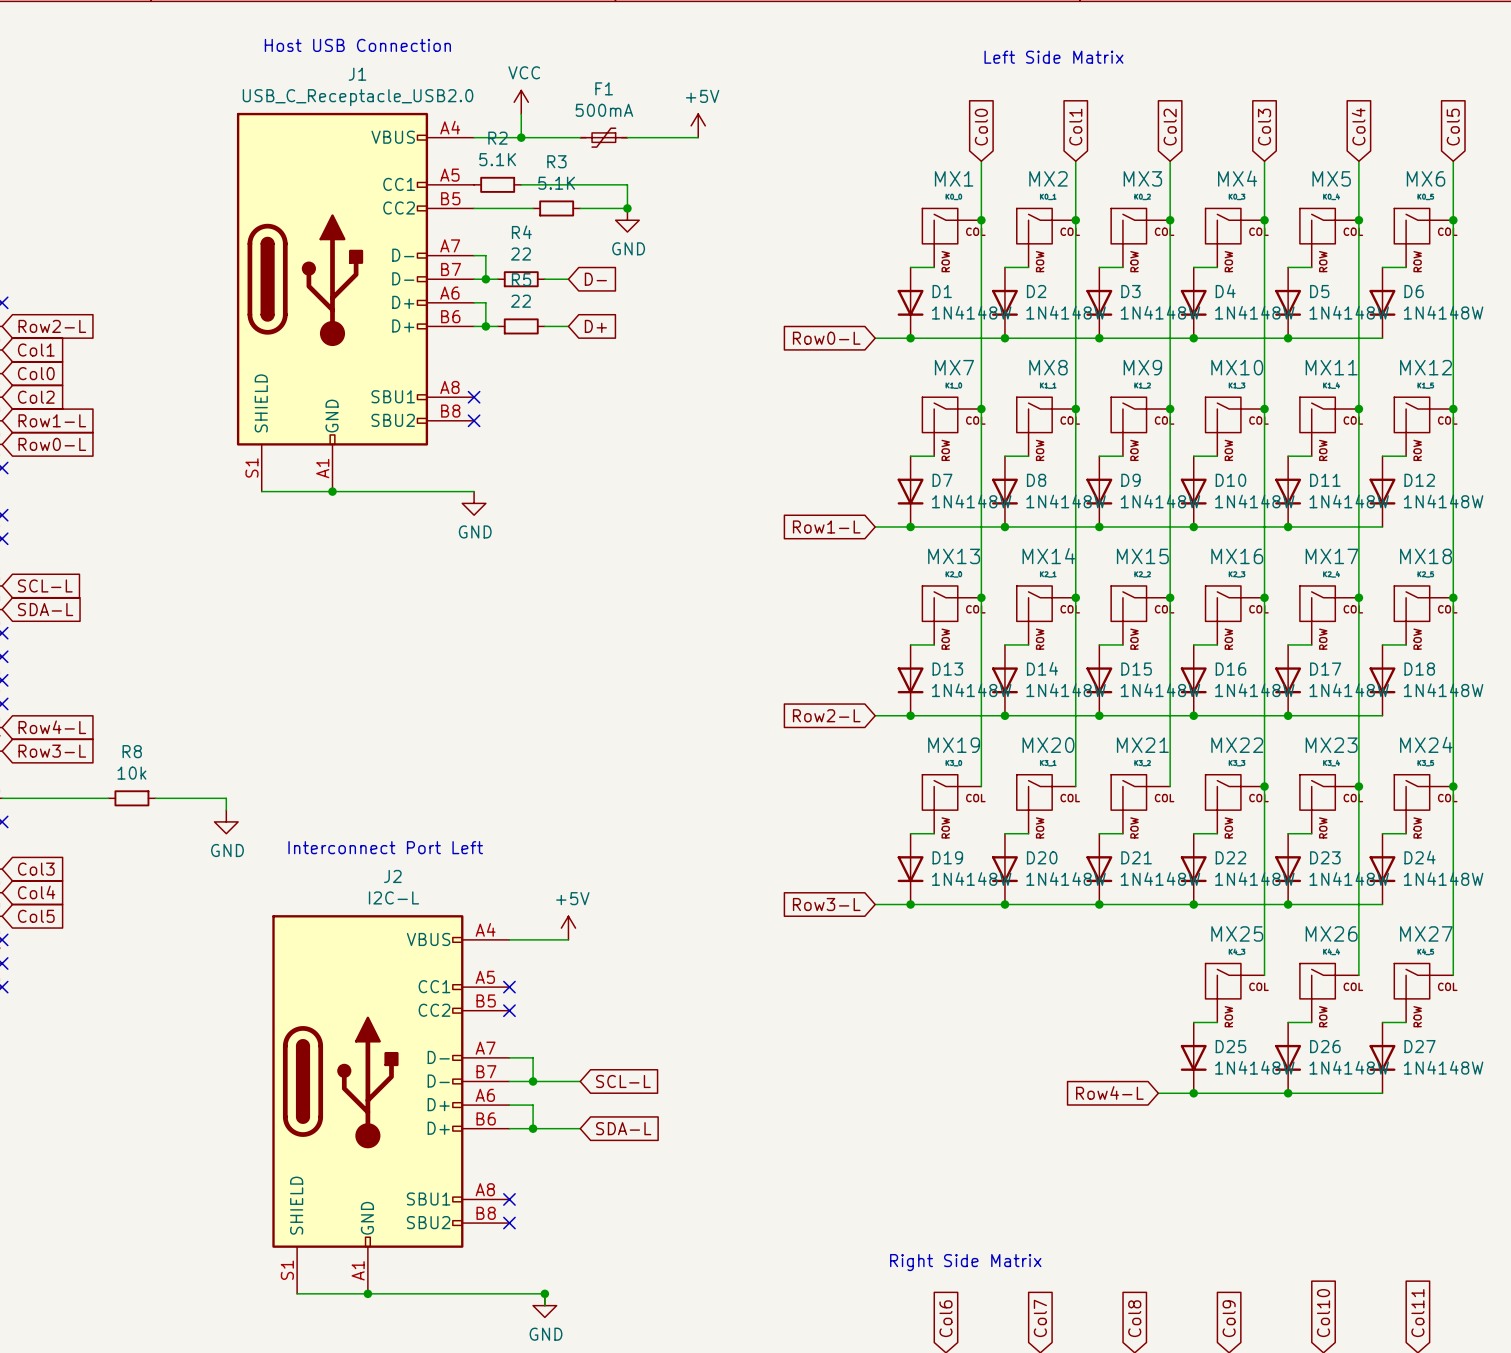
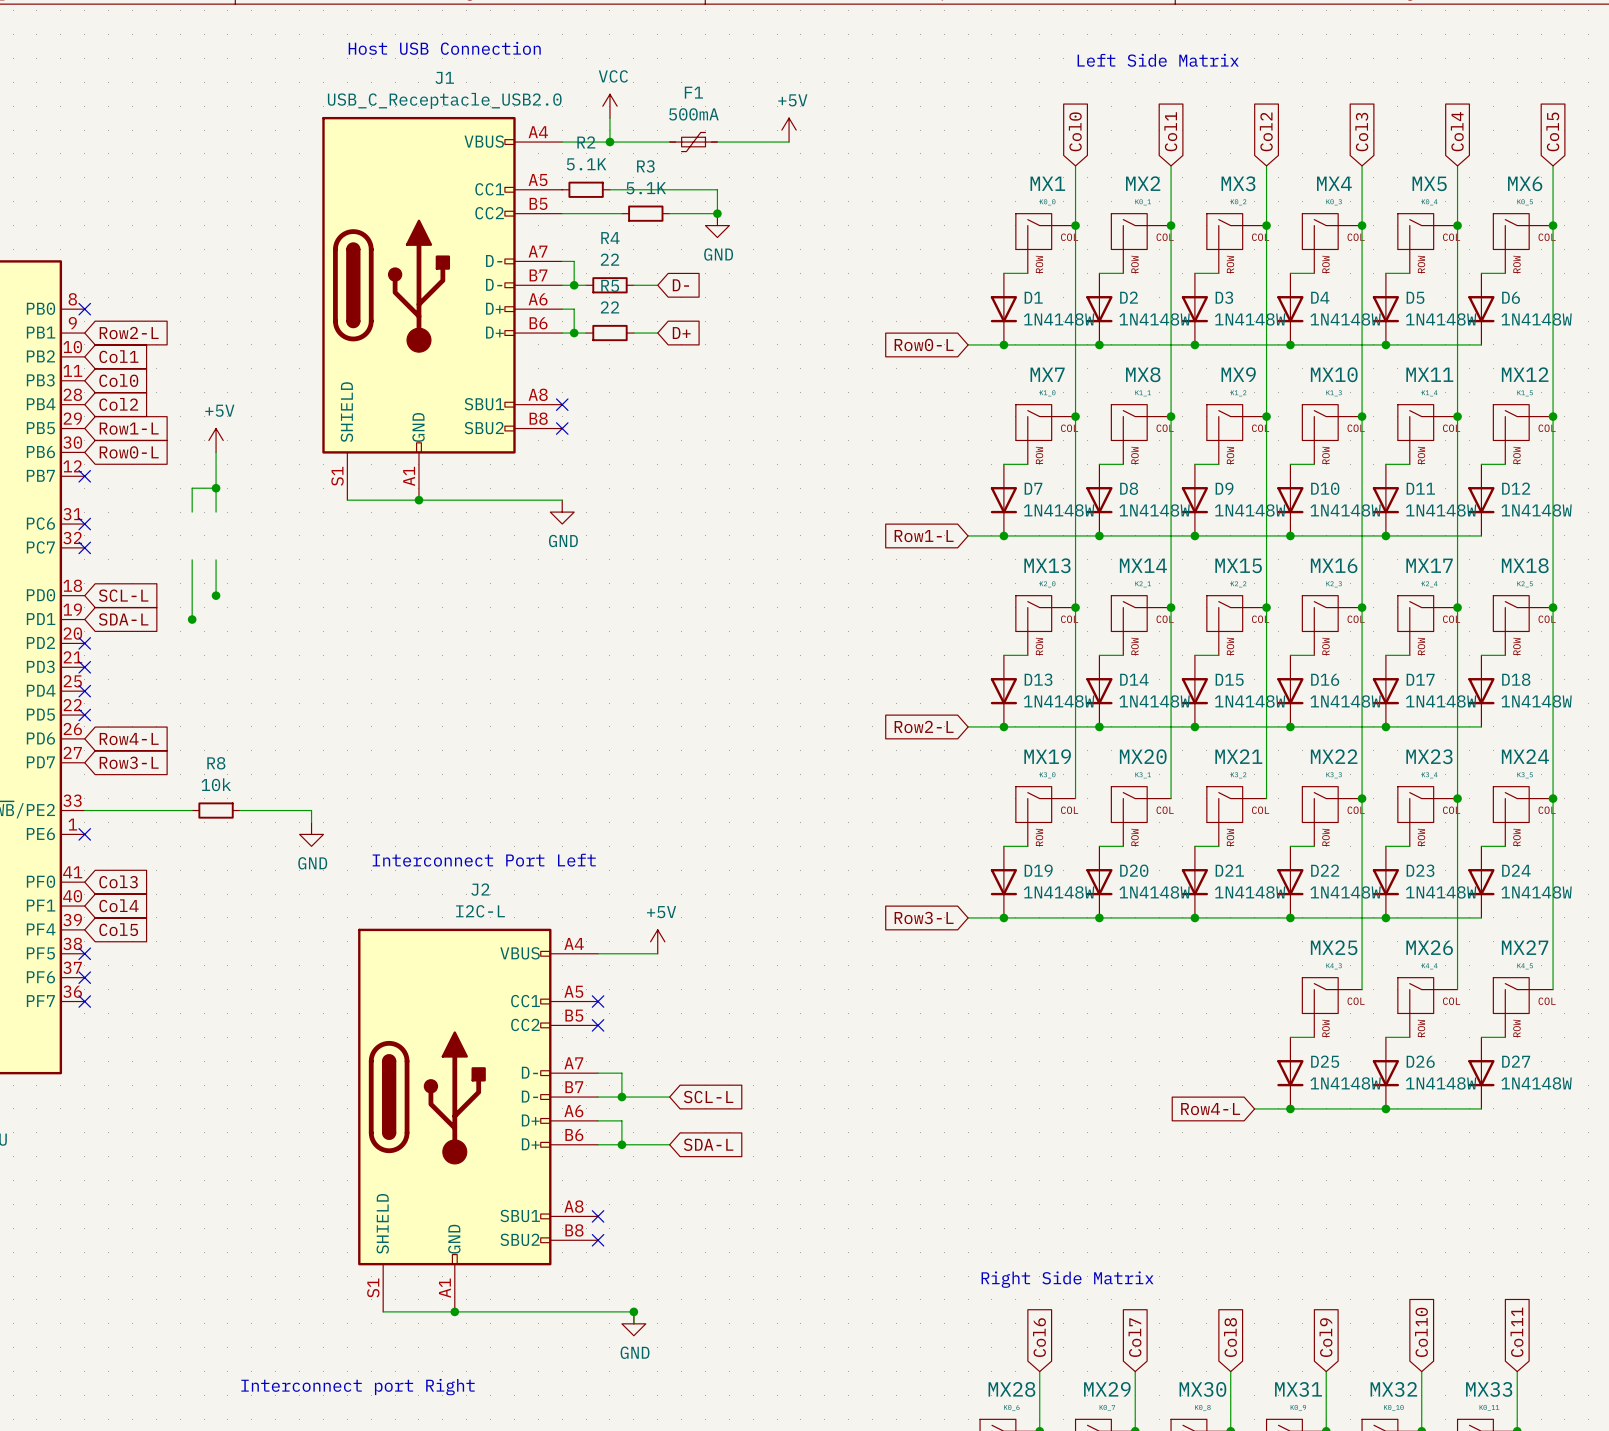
power symbol: none -> +5V (216, 440)
wire: none -> (216, 452) (216, 512)
wire: none -> (216, 488) (192, 488) (192, 512)
junction: none -> (216, 488)
wire: none -> (192, 559) (192, 619)
wire: none -> (216, 559) (216, 595)
junction: none -> (216, 595)
junction: none -> (192, 619)

